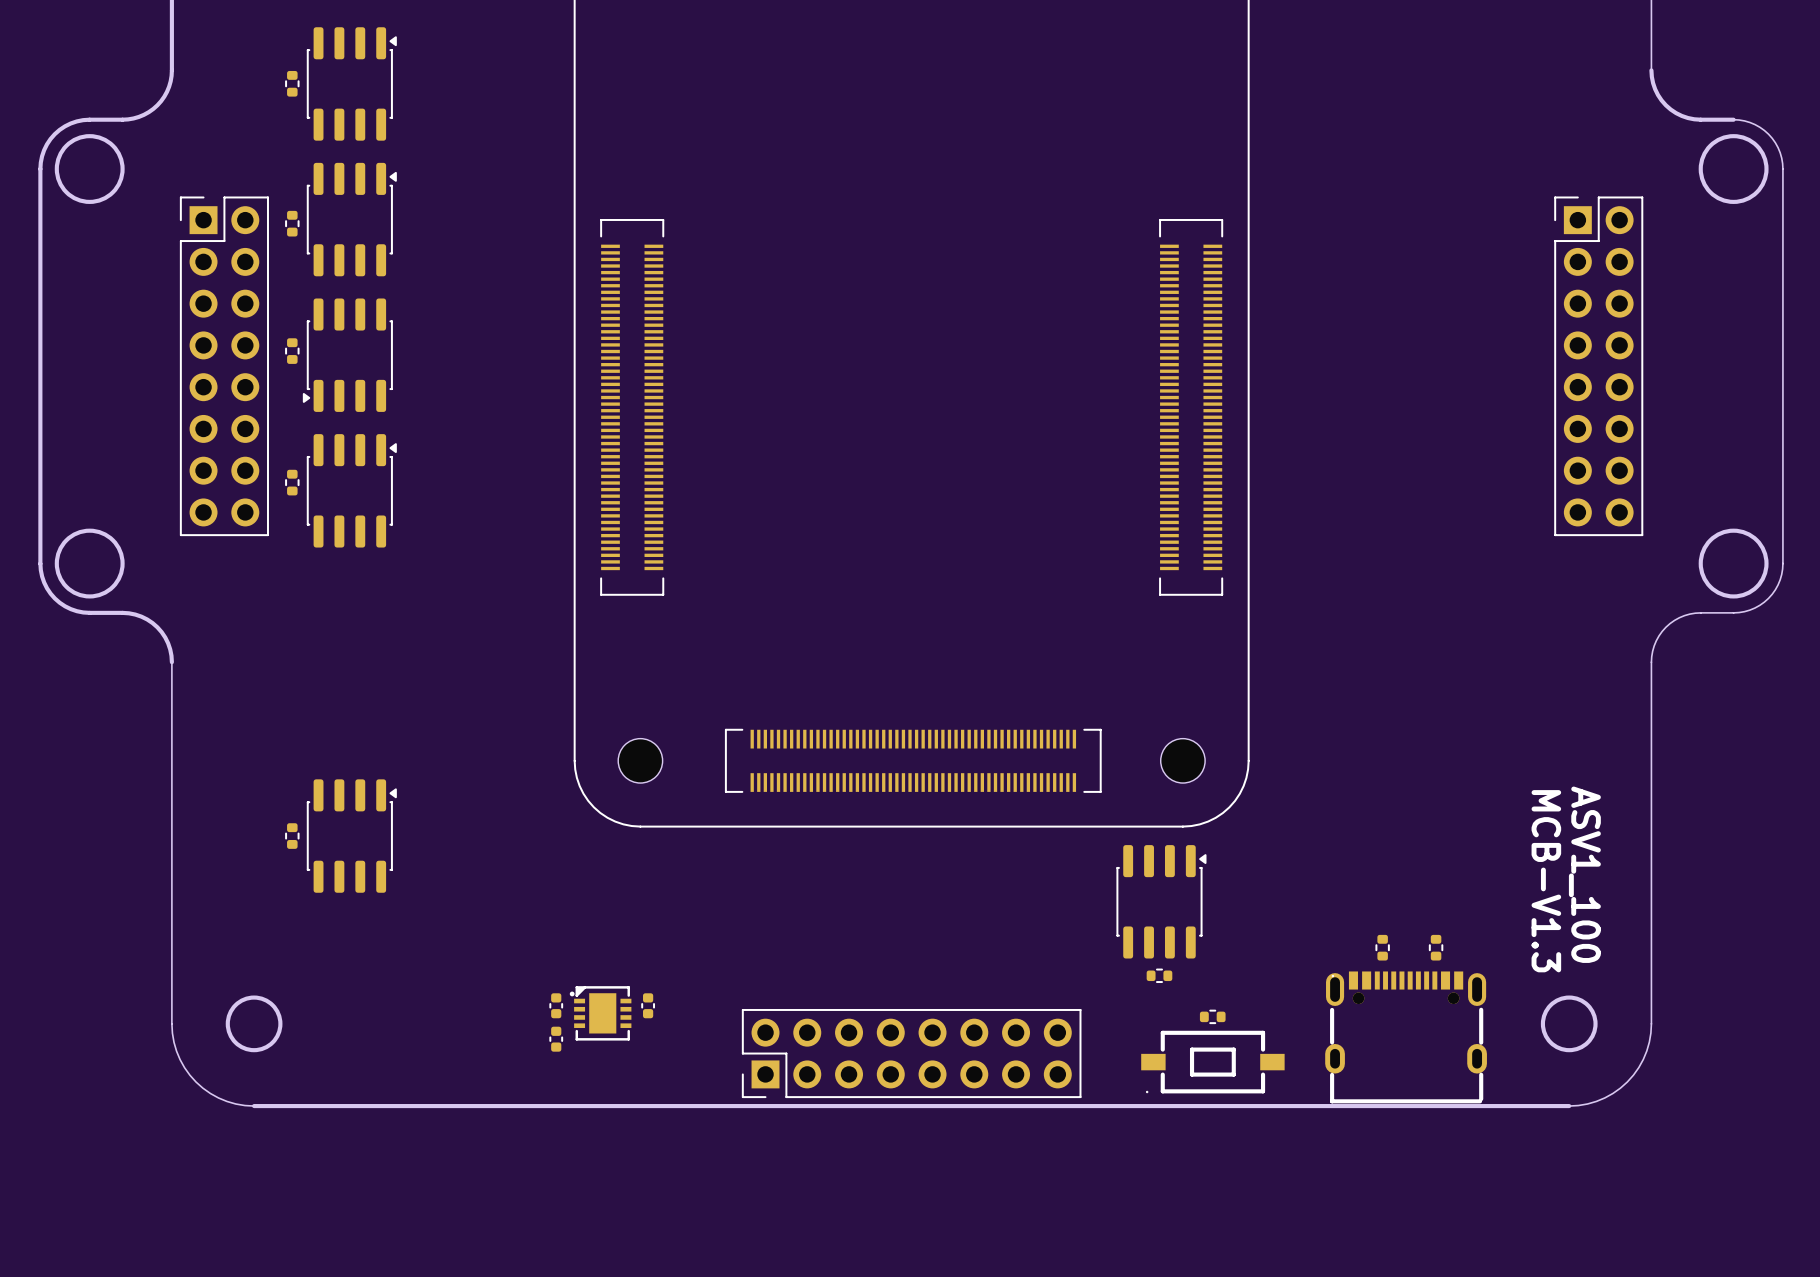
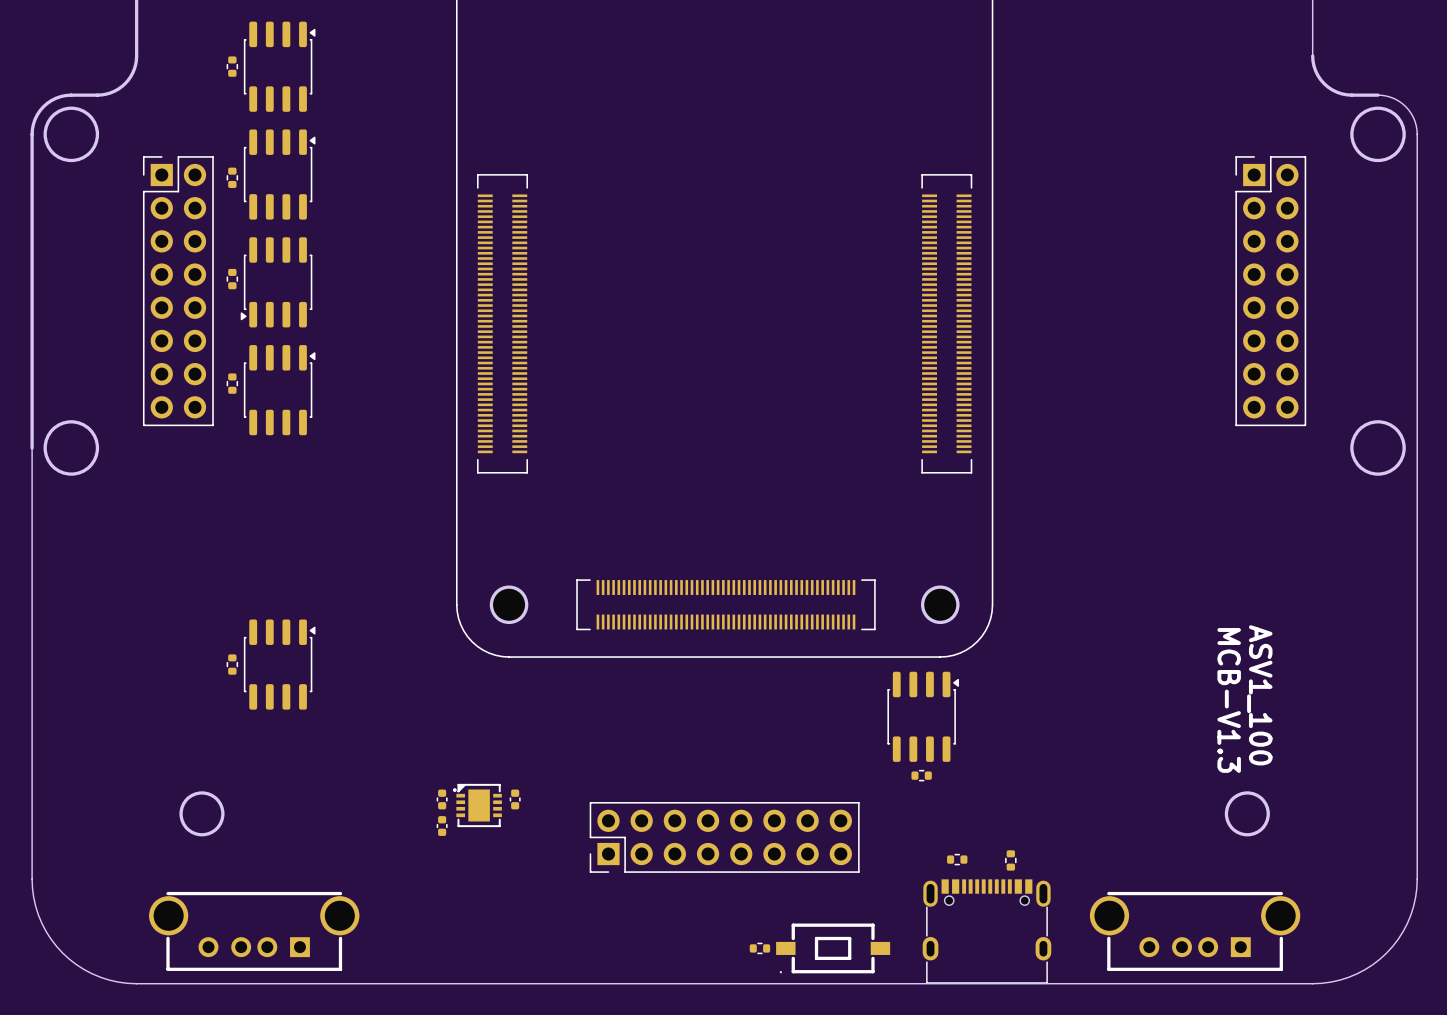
board edge: (1733, 119) (1749, 122) (1764, 130) (1775, 142) (1782, 163) (1782, 569) (1775, 589) (1764, 602) (1755, 608) (1739, 612) (1700, 612) -> (1378, 95) (1390, 97) (1405, 106) (1413, 117) (1417, 134) (1417, 879) (1415, 897) (1410, 914) (1403, 931) (1392, 946) (1379, 959) (1364, 969) (1339, 980) (1312, 983) (136, 983) (118, 982) (100, 977) (76, 964) (56, 946) (41, 923) (35, 906) (32, 888) (32, 448)
board edge: (40, 563) (42, 576) (47, 588) (54, 598) (65, 606) (83, 612) (129, 613) (141, 616) (152, 623) (161, 632) (170, 649) (171, 662) (171, 1024) -> none
board edge: (1700, 612) (1684, 615) (1670, 623) (1656, 640) (1651, 656) (1651, 1023) -> none
round board edge: none -> [489, 585, 529, 625]
round board edge: none -> [920, 585, 960, 625]
part: (1382, 947) -> none
part: (1436, 947) -> none
part: (1212, 1016) -> none
board edge: (1651, 1023) (1649, 1042) (1643, 1059) (1627, 1081) (1612, 1093) (1596, 1101) (1569, 1106) (244, 1105) (226, 1101) (210, 1093) (189, 1075) (176, 1051) (171, 1024) -> none
part: (1406, 1037) -> none
part position: (1212, 1062) -> (833, 948)
part: none -> (957, 859)
part: none -> (1010, 860)
part: none -> (254, 931)
part: none -> (986, 931)
part: none -> (1195, 931)
part: none -> (759, 948)

